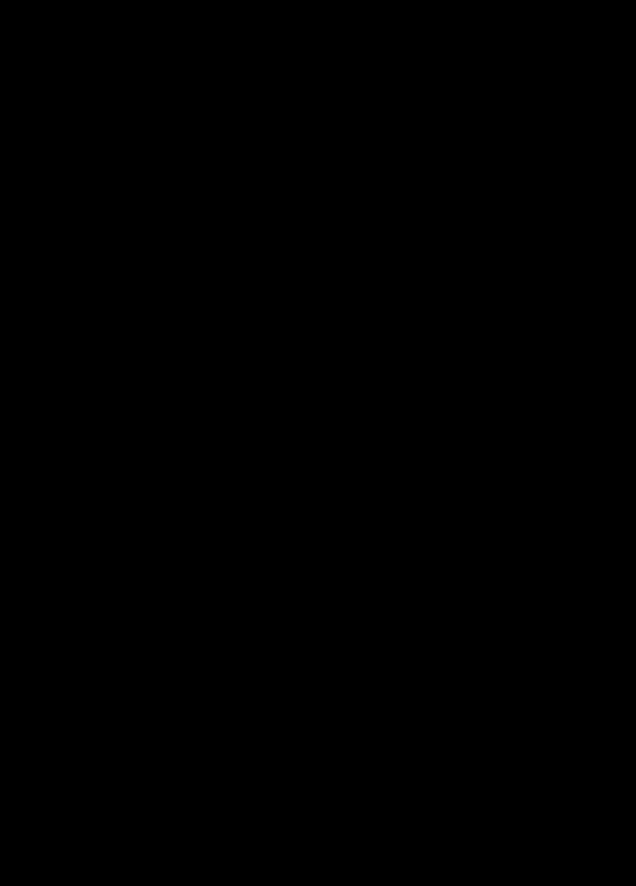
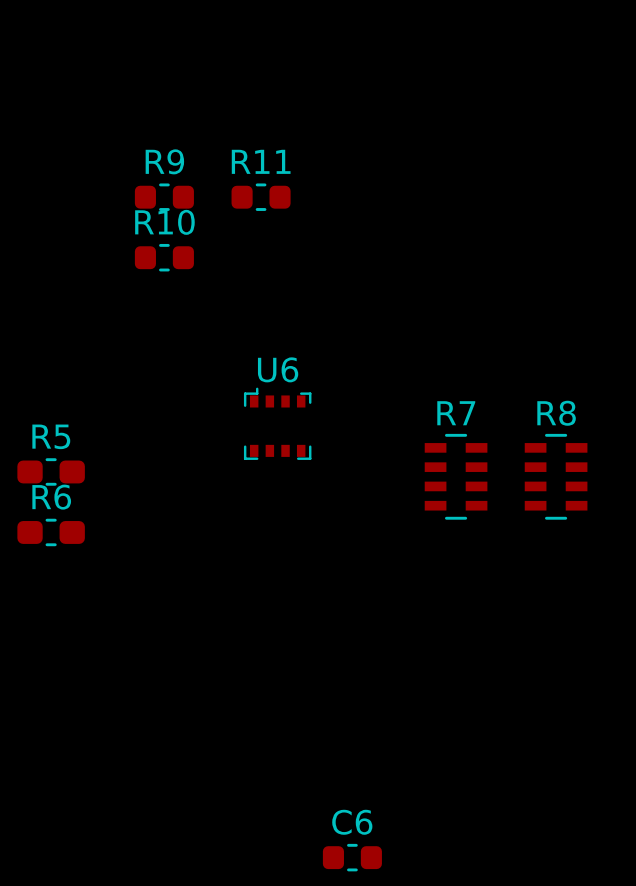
R9: none -> (164, 197)
R11: none -> (261, 197)
R10: none -> (164, 257)
U6: none -> (277, 423)
R5: none -> (51, 471)
R7: none -> (456, 476)
R8: none -> (556, 476)
R6: none -> (51, 532)
C6: none -> (352, 857)

